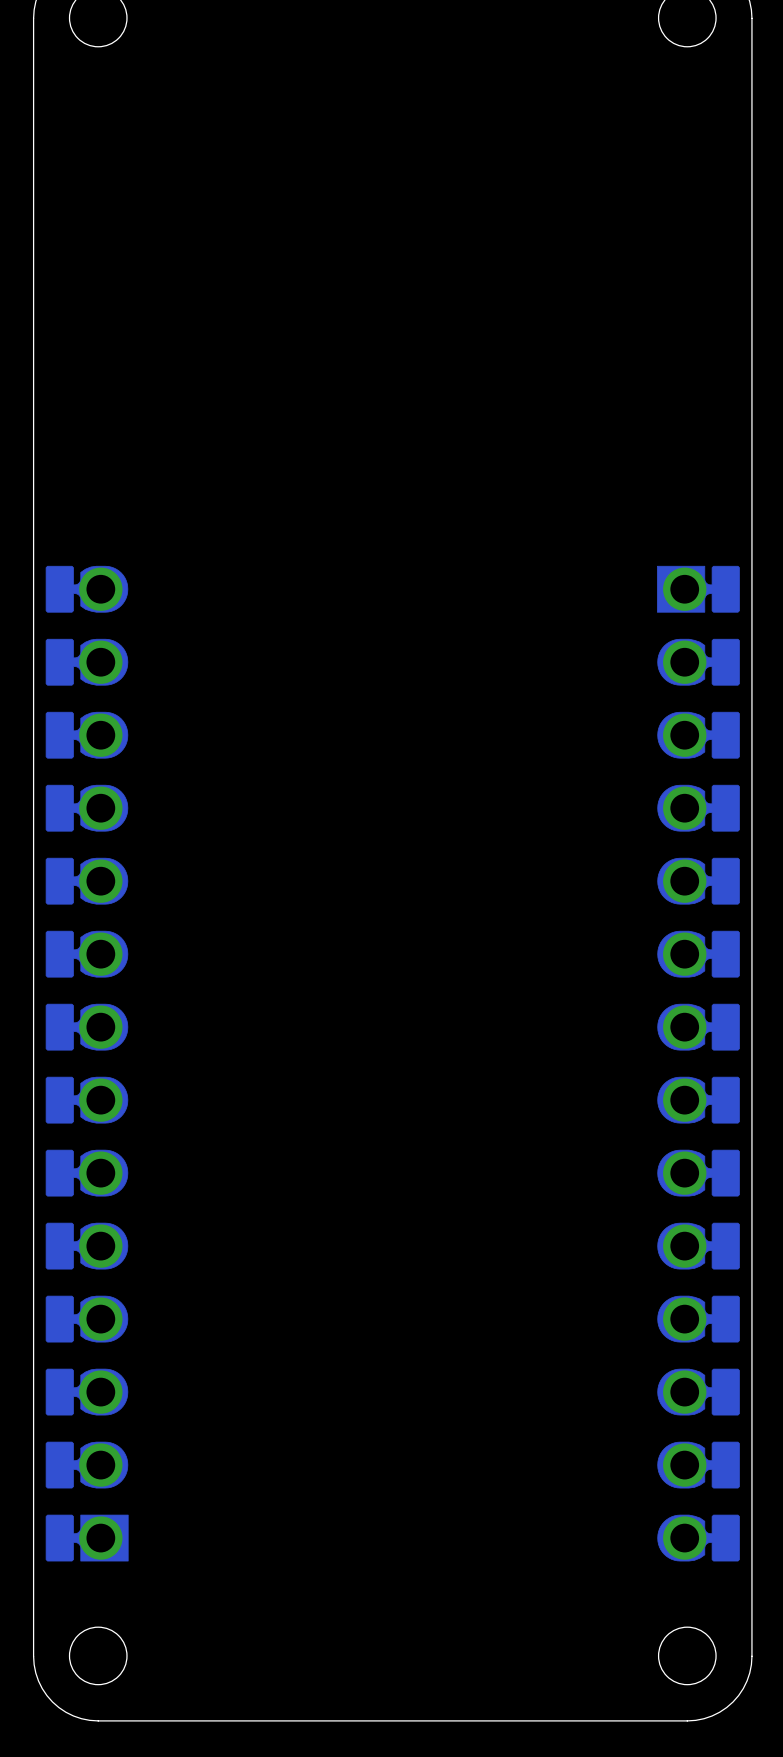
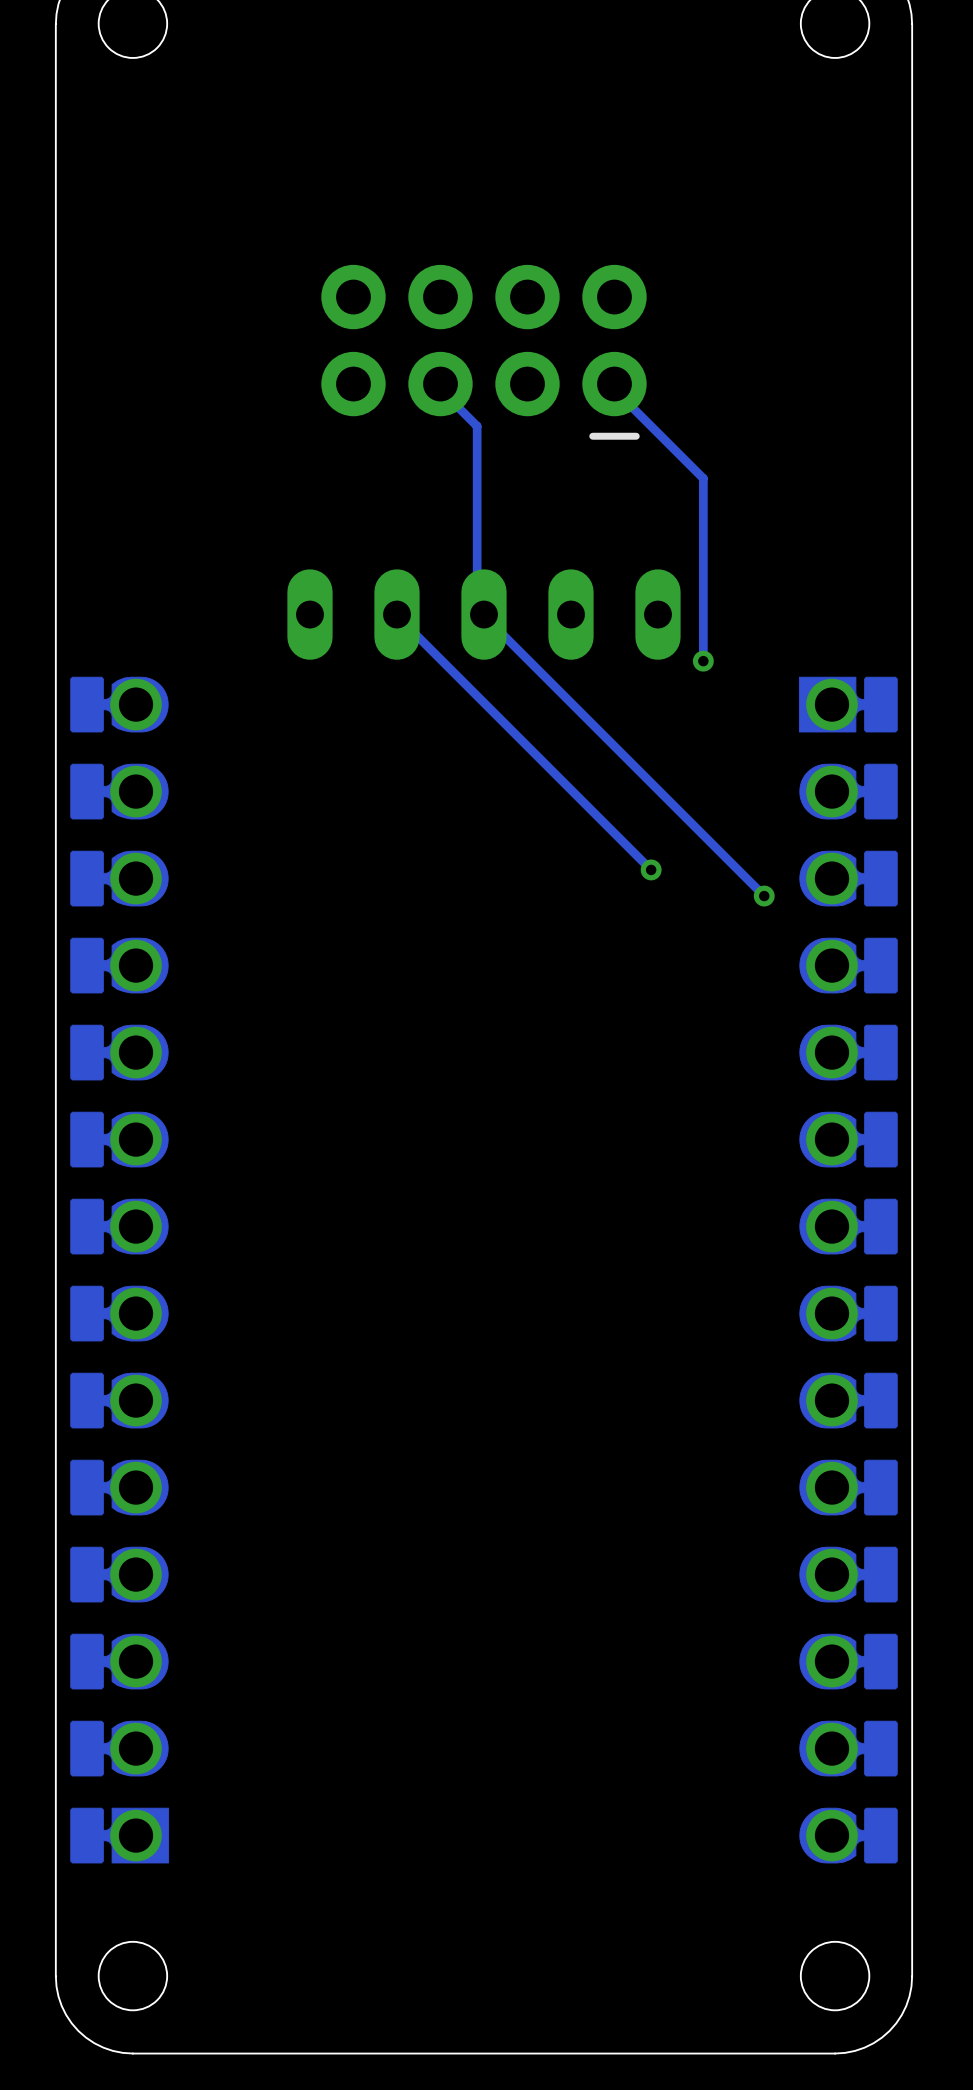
part: none -> (483, 352)
track: none -> (440, 384) (442, 391) (477, 426) (477, 608) (764, 896)
track: none -> (614, 384) (616, 391) (703, 478) (703, 661)
track: none -> (396, 614) (651, 869)
part: none -> (483, 614)
via: none -> (703, 661)
via: none -> (651, 869)
via: none -> (764, 896)

